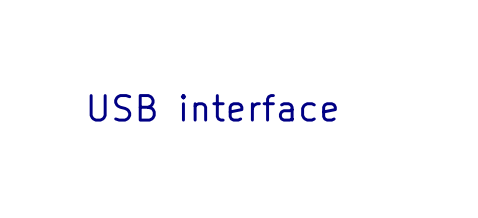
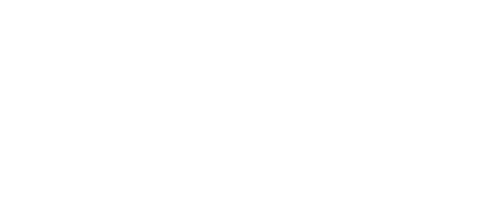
text: USB interface (213, 107) -> none

